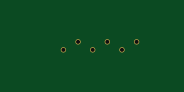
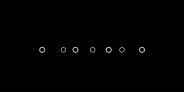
via: (78, 41) -> none
via: (107, 41) -> none
via: (136, 41) -> none
via: none -> (42, 49)
via: none -> (75, 49)
via: none -> (108, 49)
via: none -> (142, 49)

